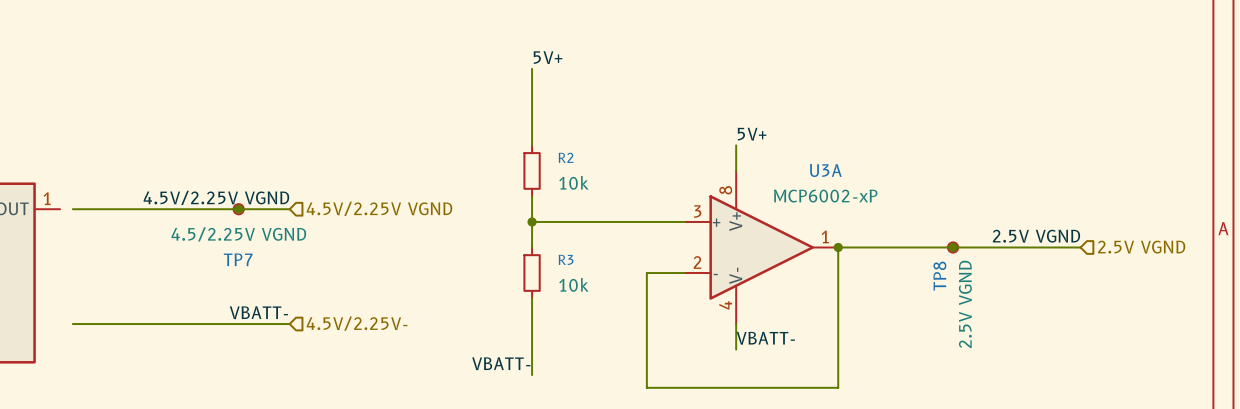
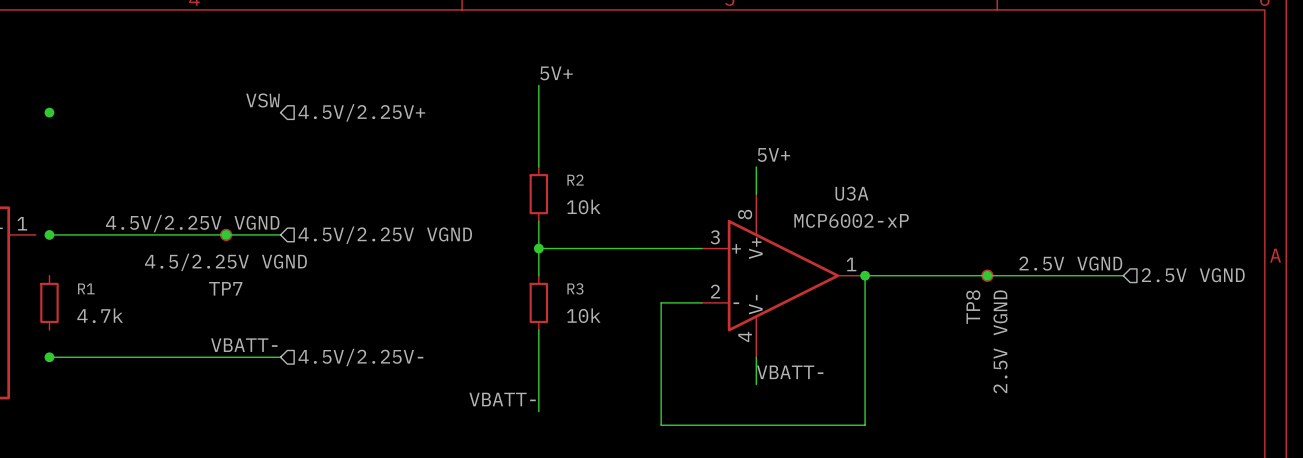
label: none -> VSW (263, 100)
junction: none -> (49, 112)
hierarchical label: none -> 4.5V/2.25V+ (361, 112)
junction: none -> (49, 234)
R1: none -> 4.7k (49, 302)
junction: none -> (49, 357)

